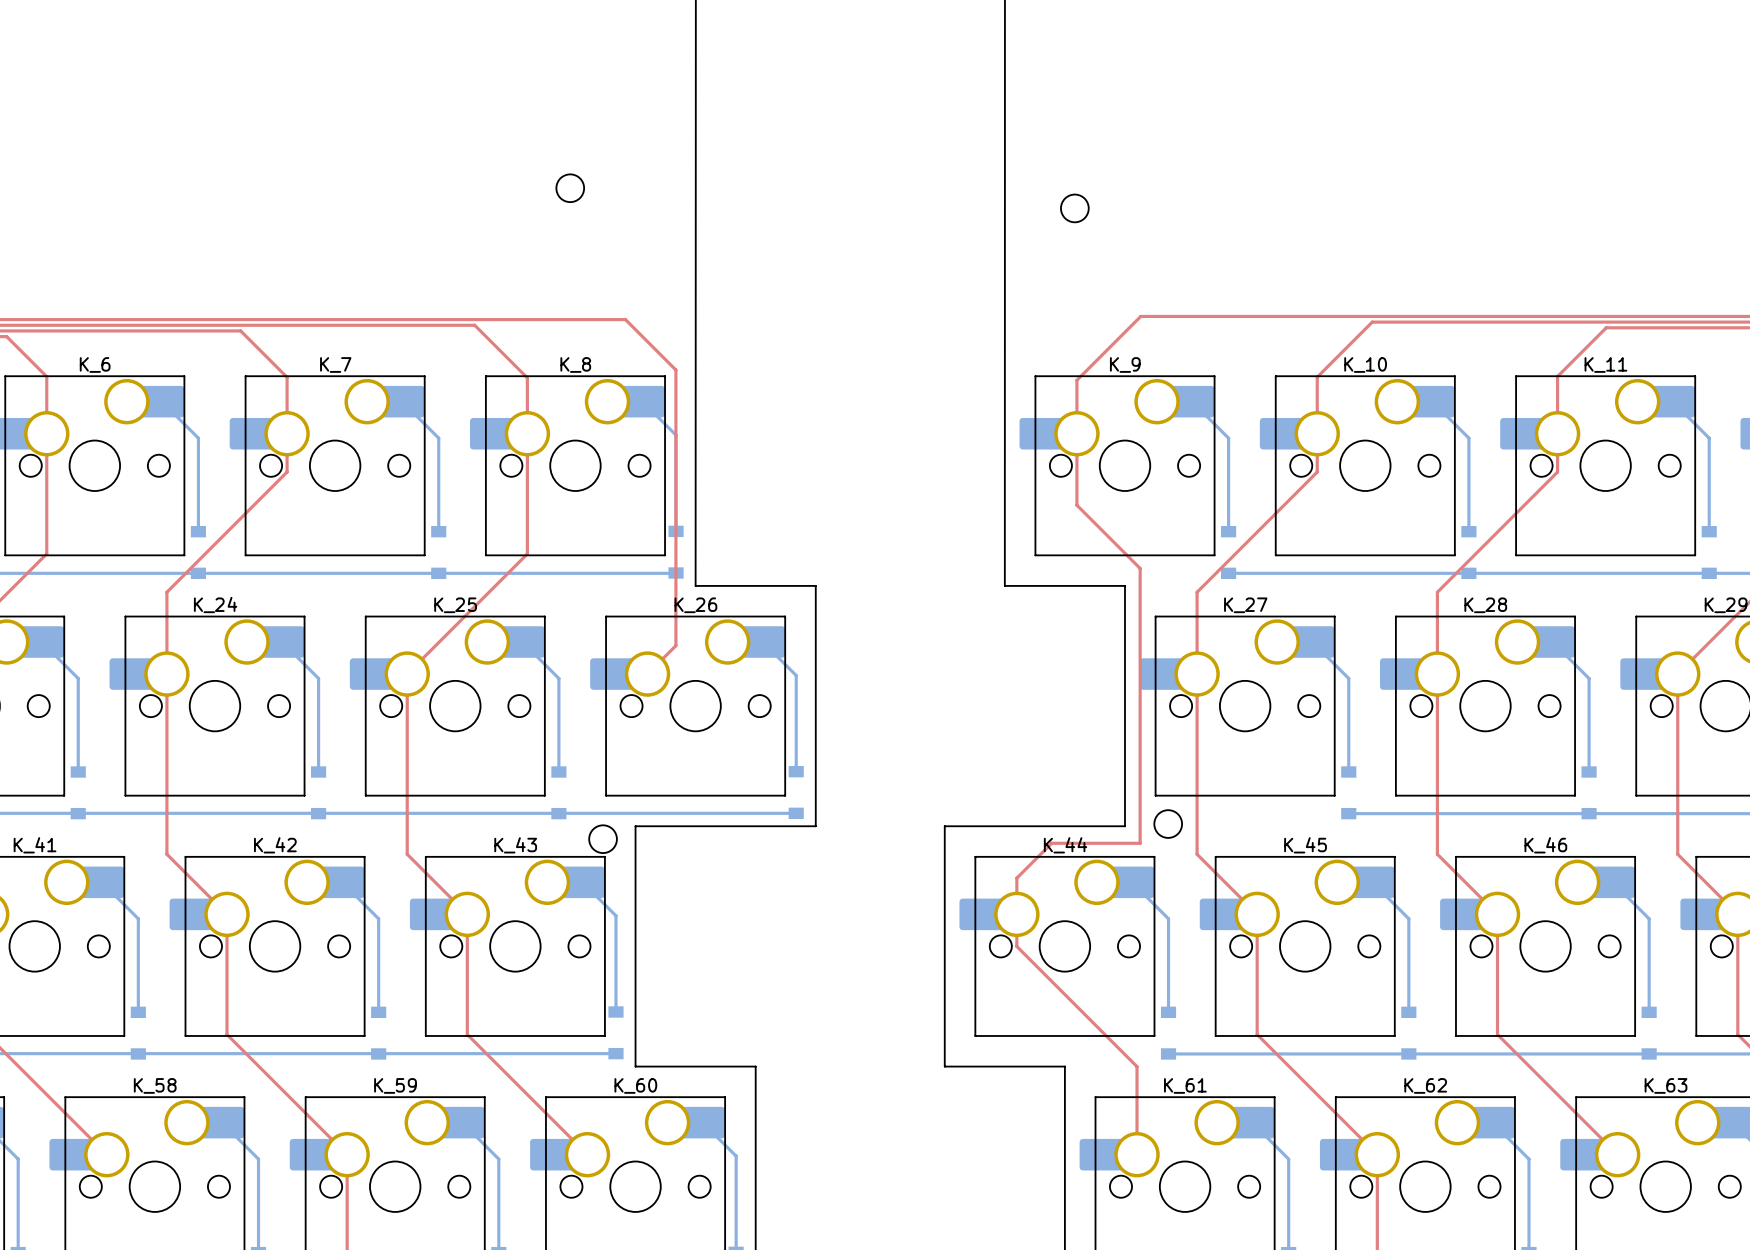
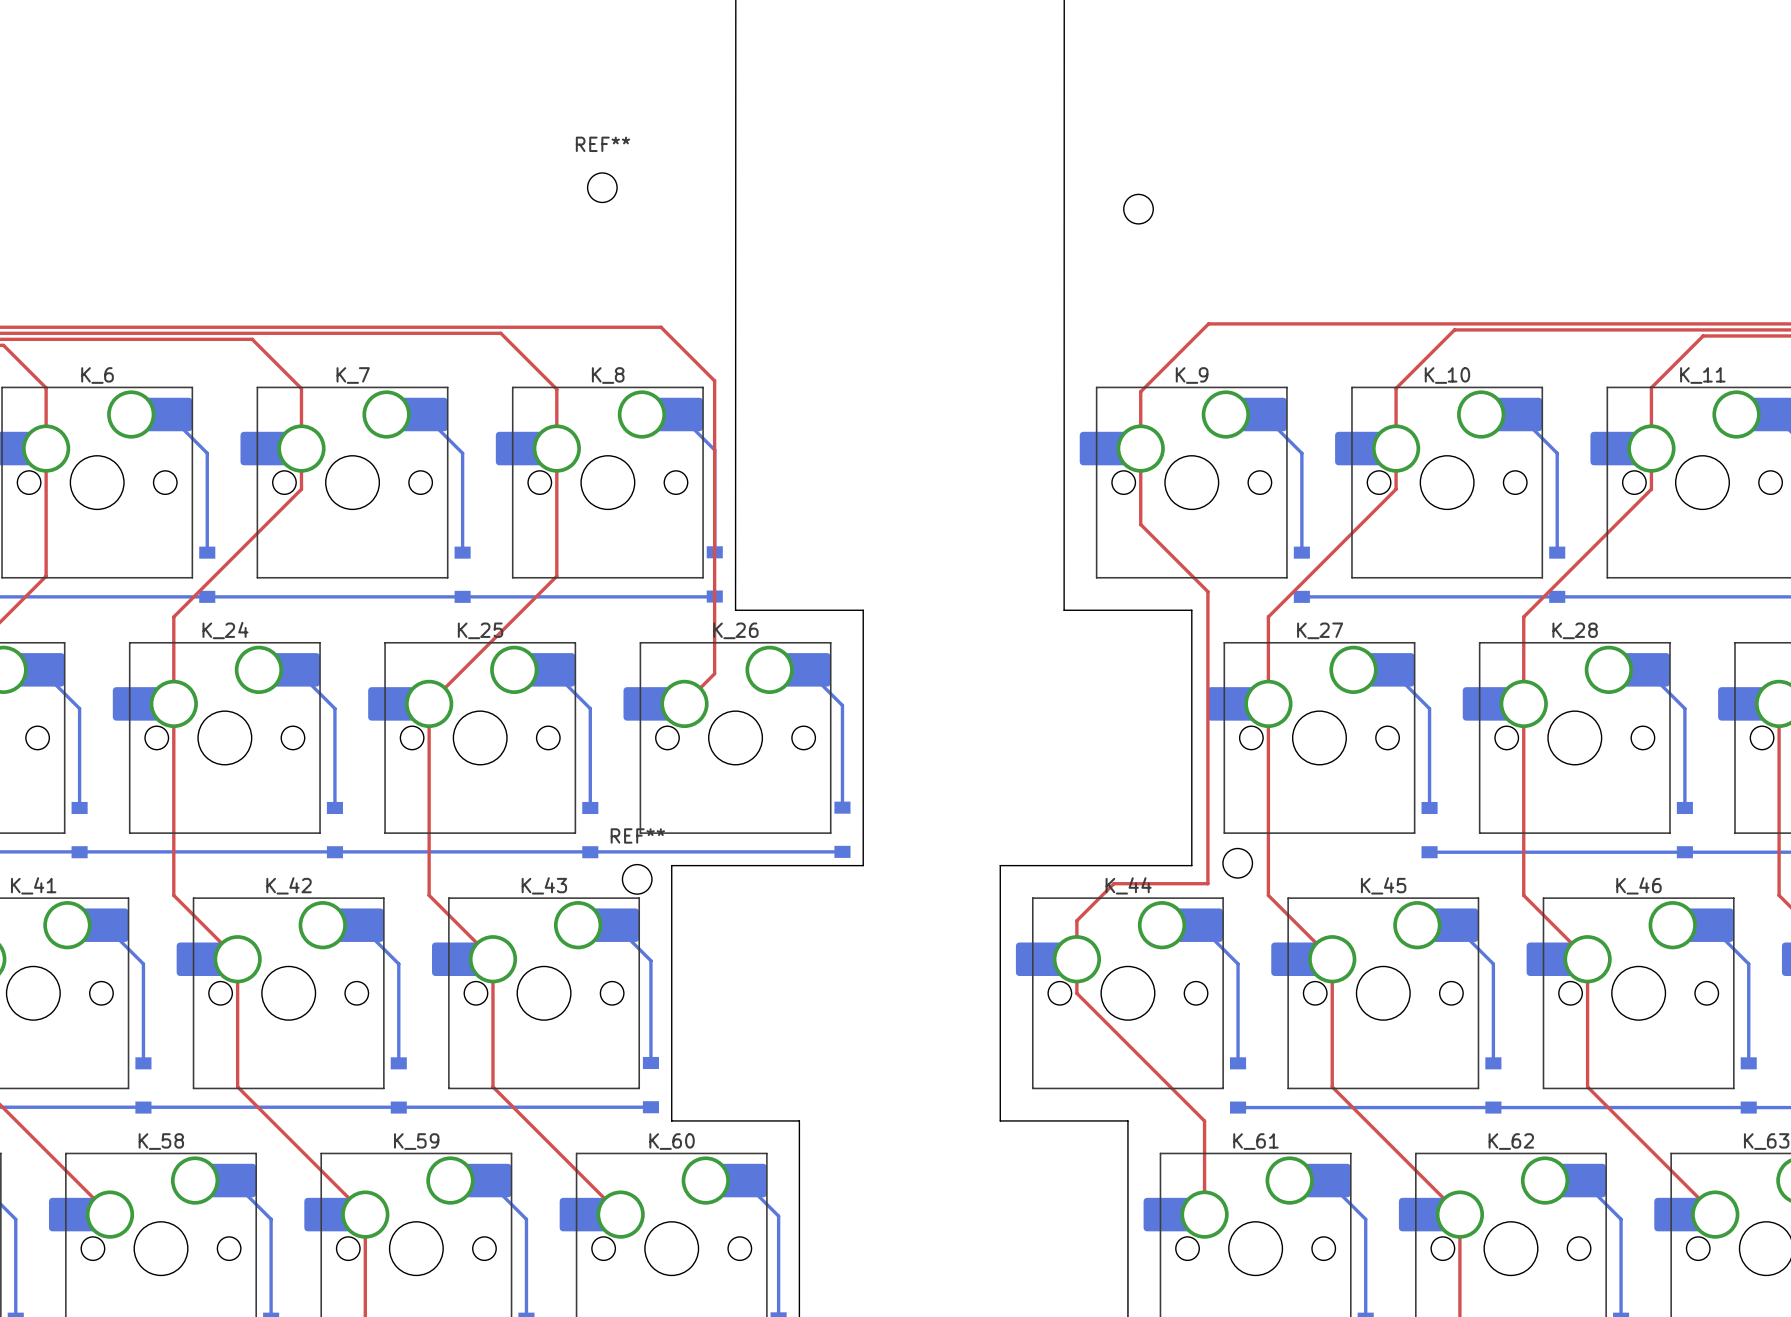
REF** name: none -> REF** (602, 144)
REF** name: none -> REF** (637, 835)

